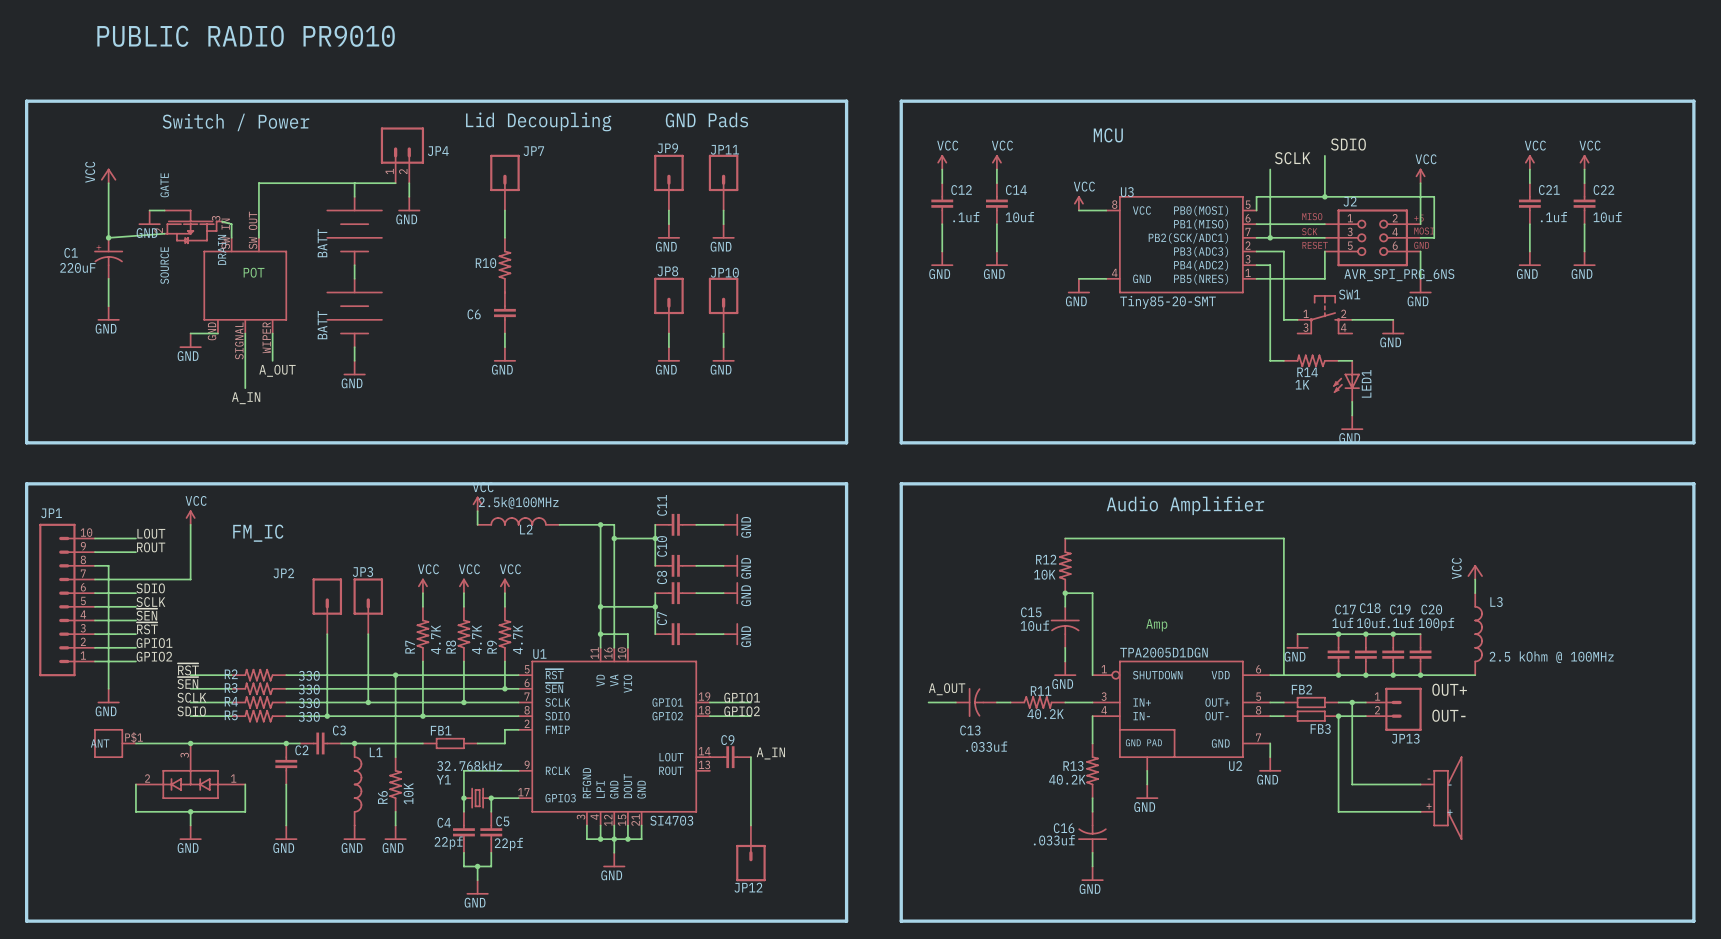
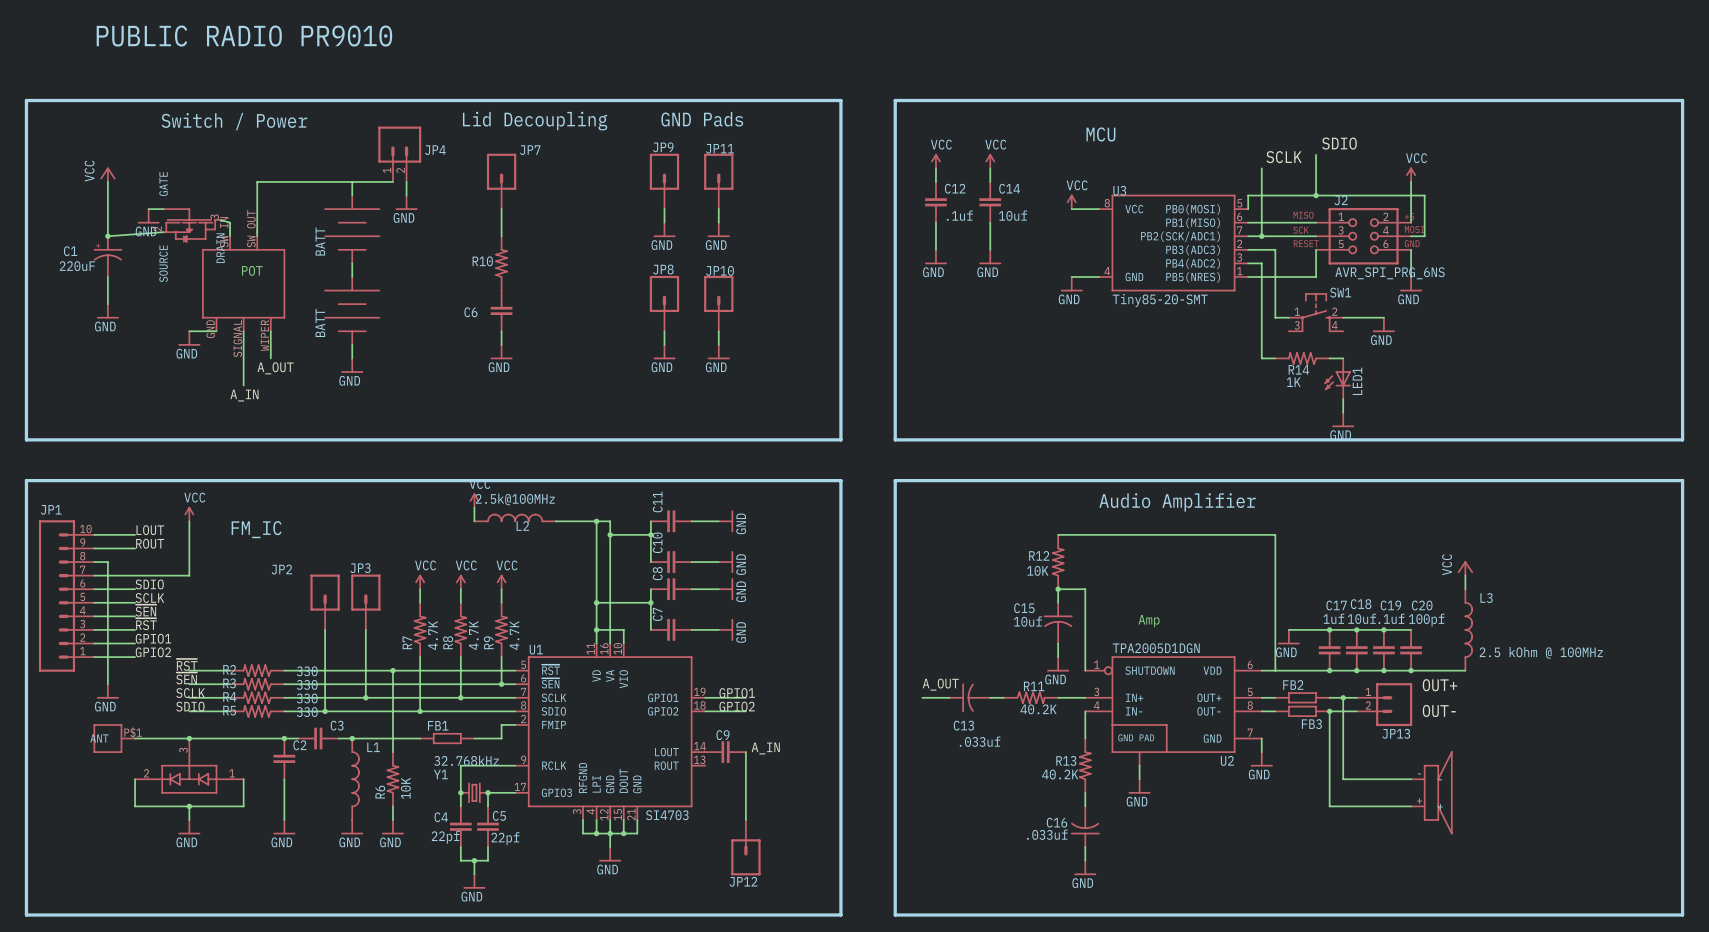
power symbol: VCC (1529, 162) -> none
power symbol: VCC (1584, 162) -> none
wire: (1529, 169) (1529, 183) -> none
wire: (1584, 169) (1584, 183) -> none
C21: .1uf (1529, 203) -> none
C22: 10uf (1584, 203) -> none
wire: (1529, 224) (1529, 251) -> none
wire: (1584, 224) (1584, 251) -> none
power symbol: GND (1529, 258) -> none
power symbol: GND (1584, 258) -> none

